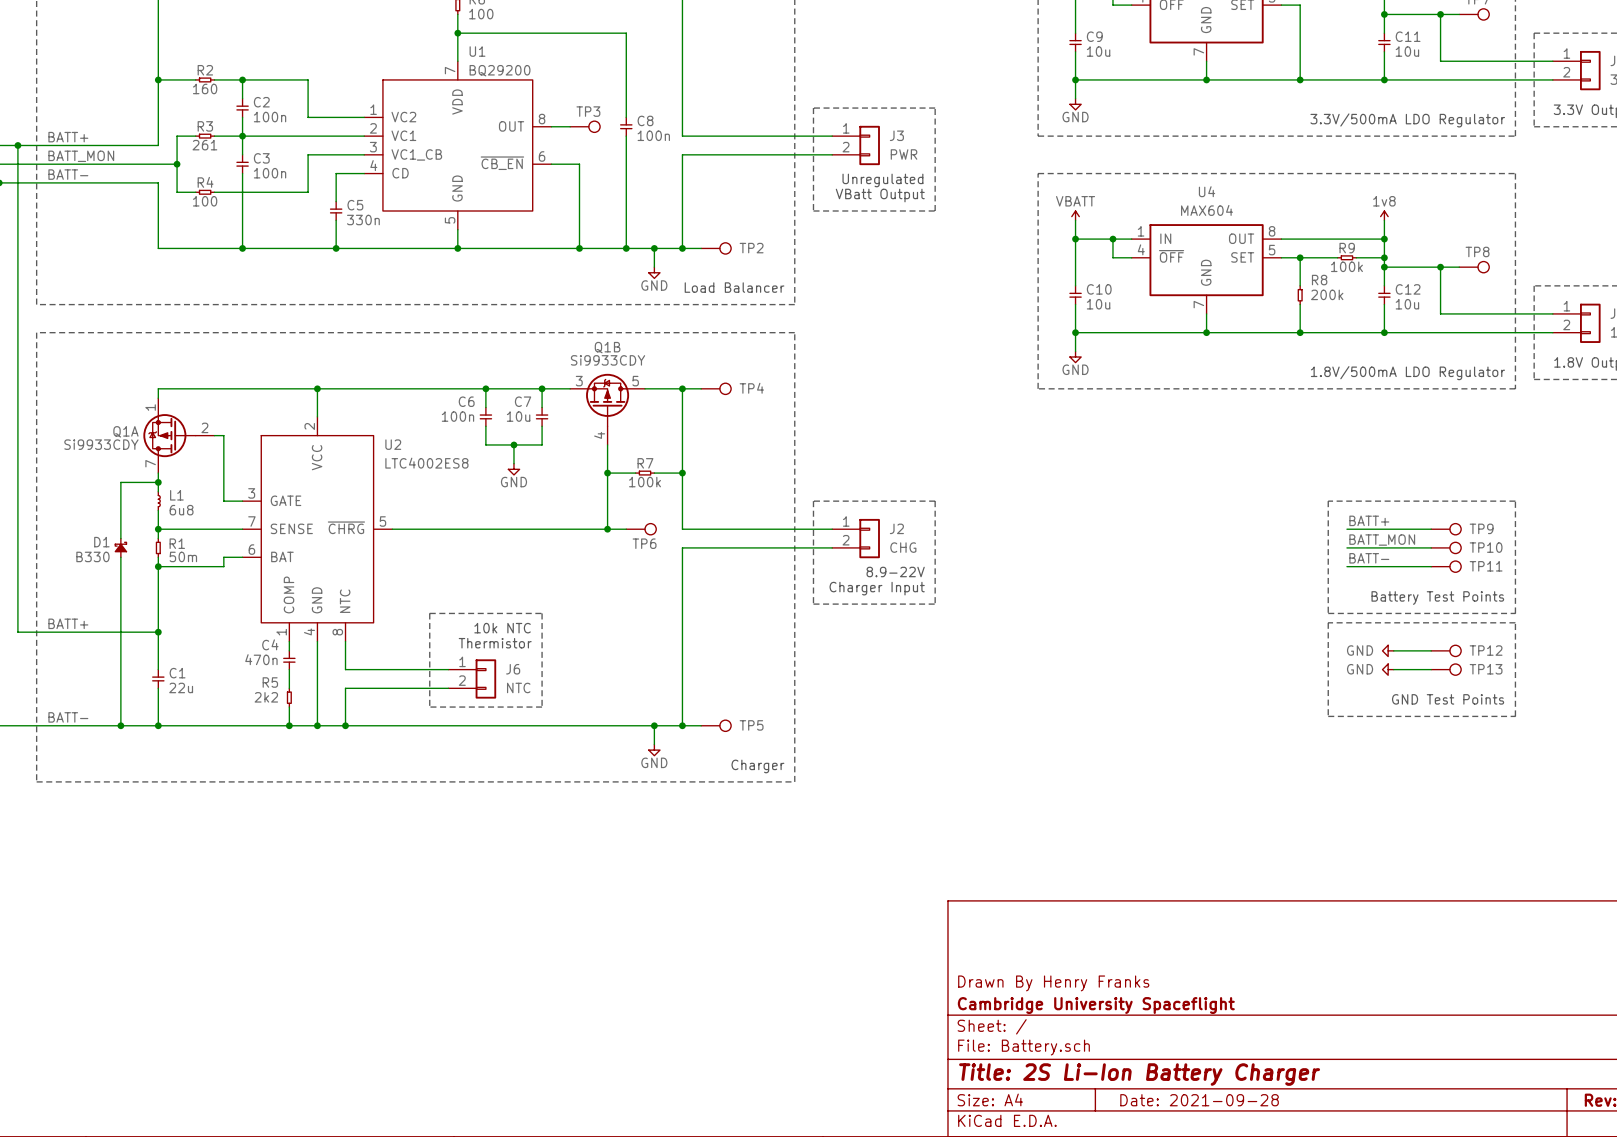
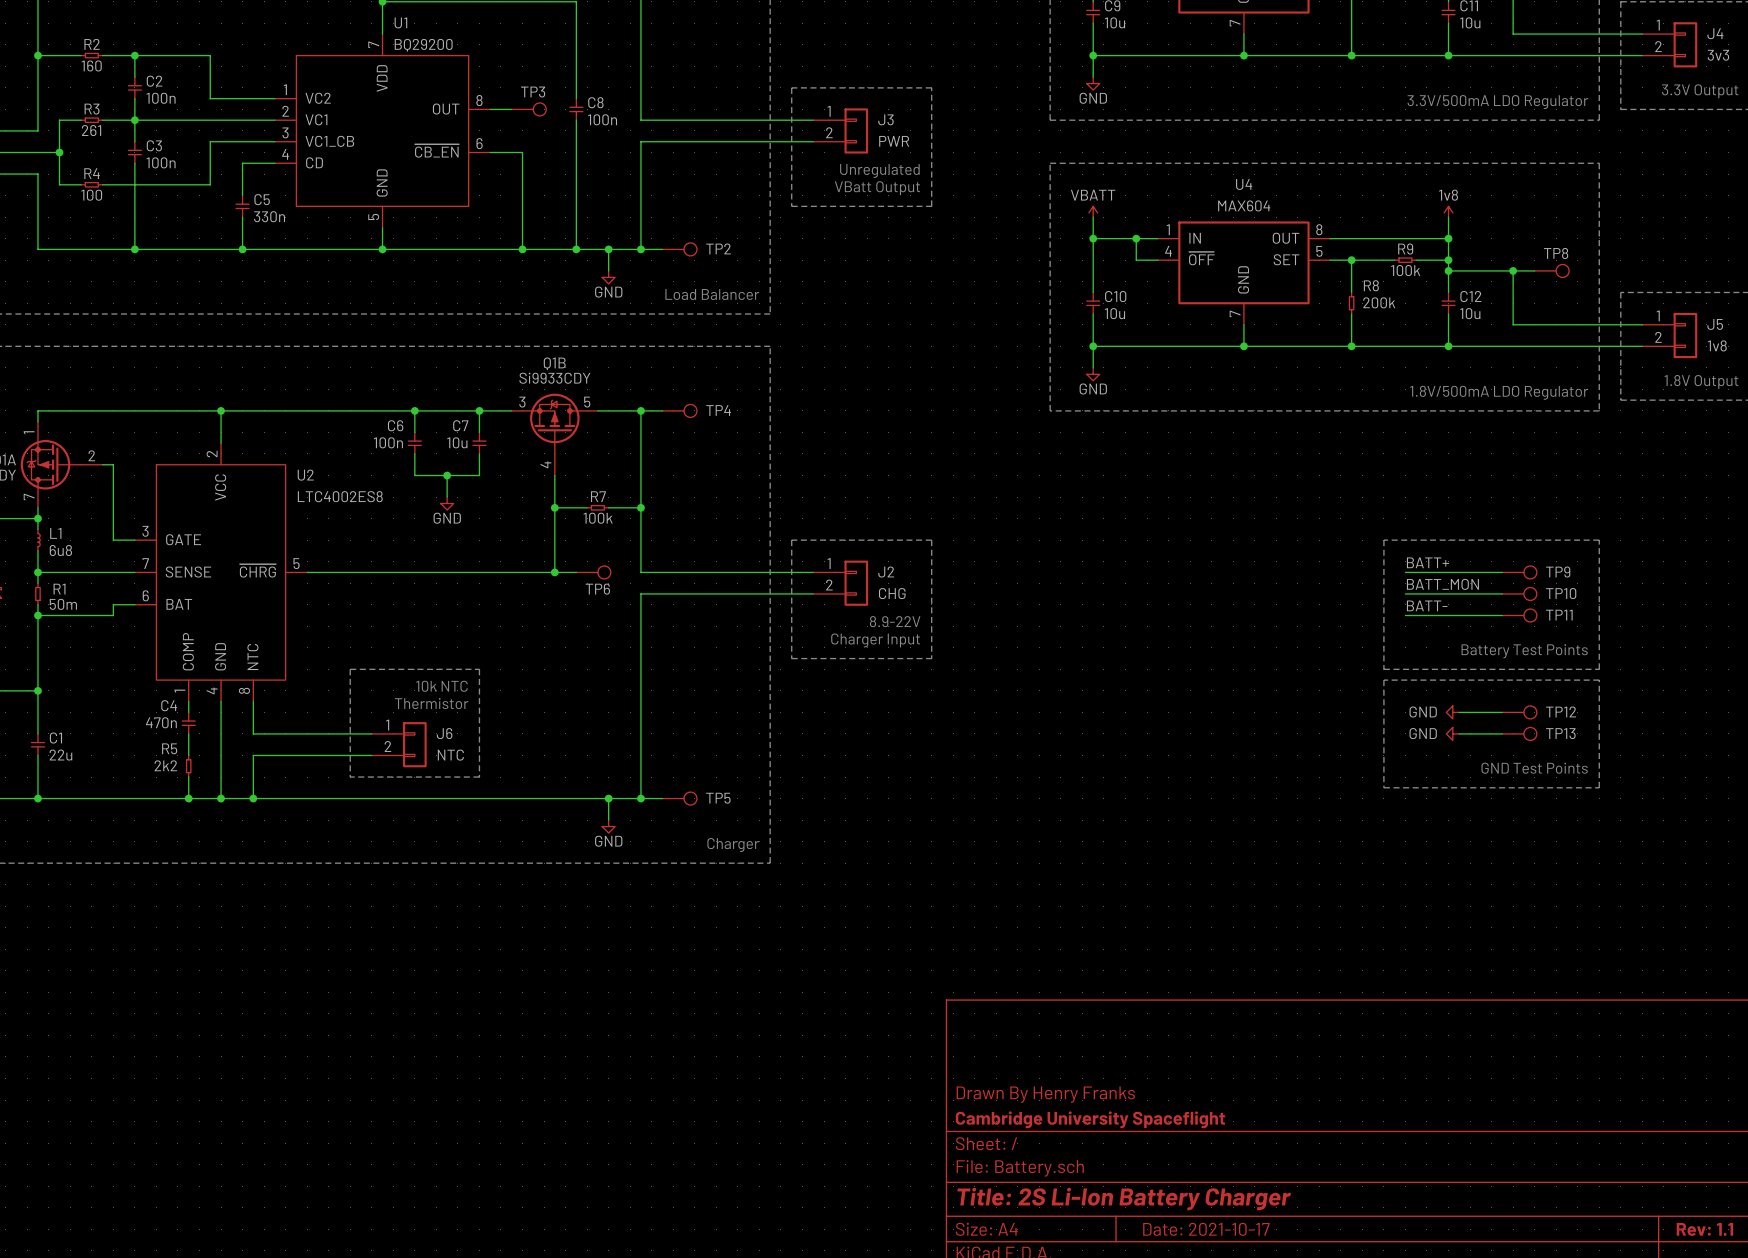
title block: Date: 2021-09-28 (1199, 1100) -> Date: 2021-10-17 (1206, 1229)

